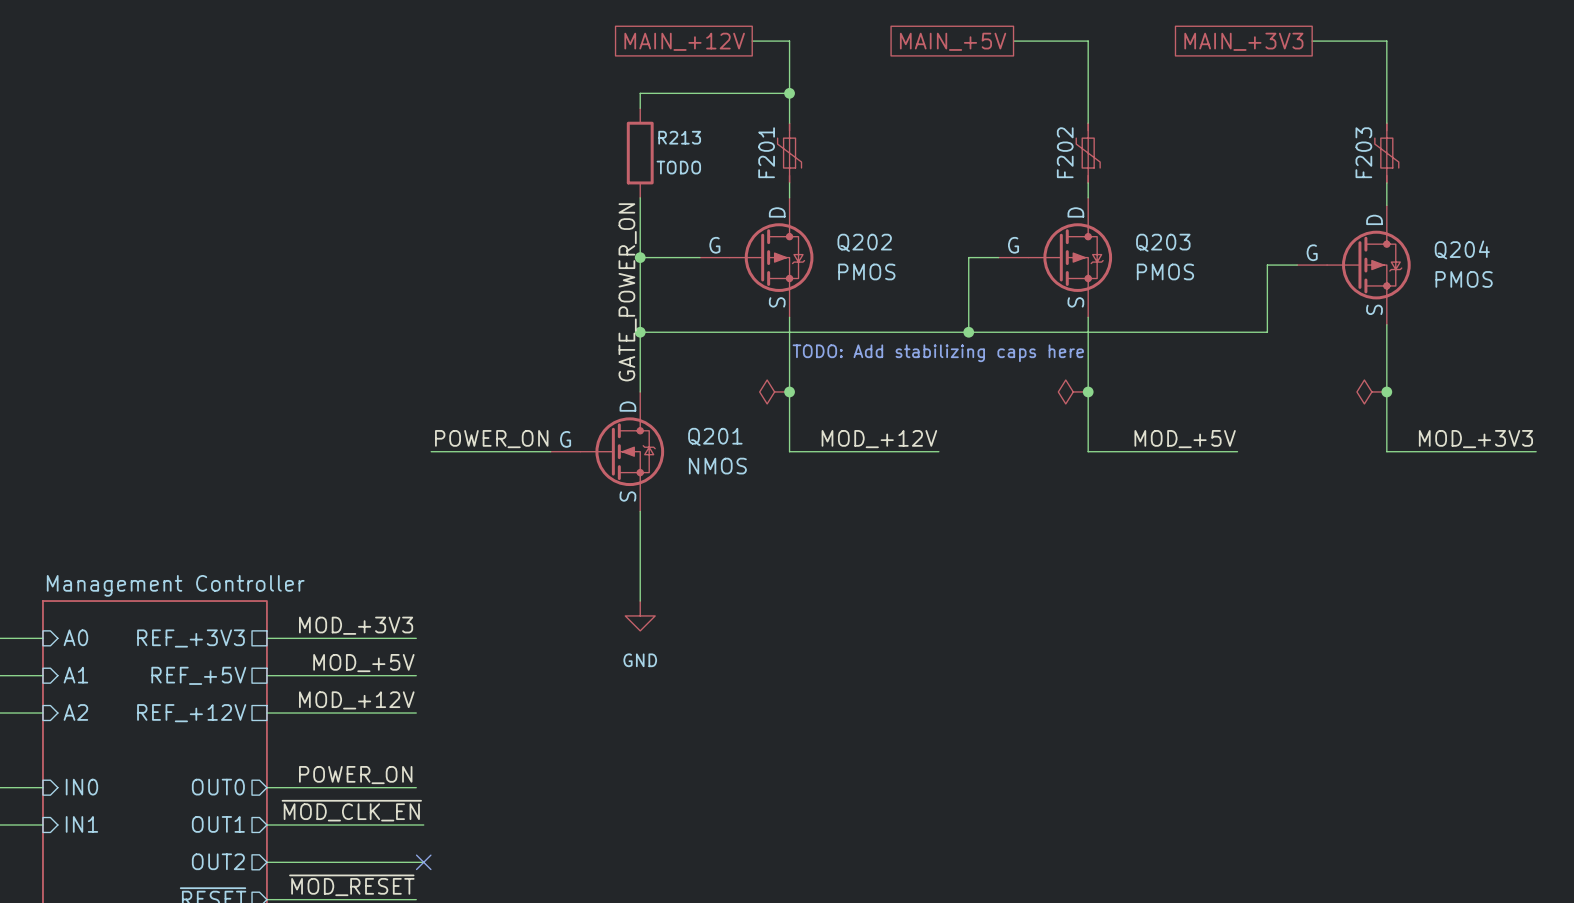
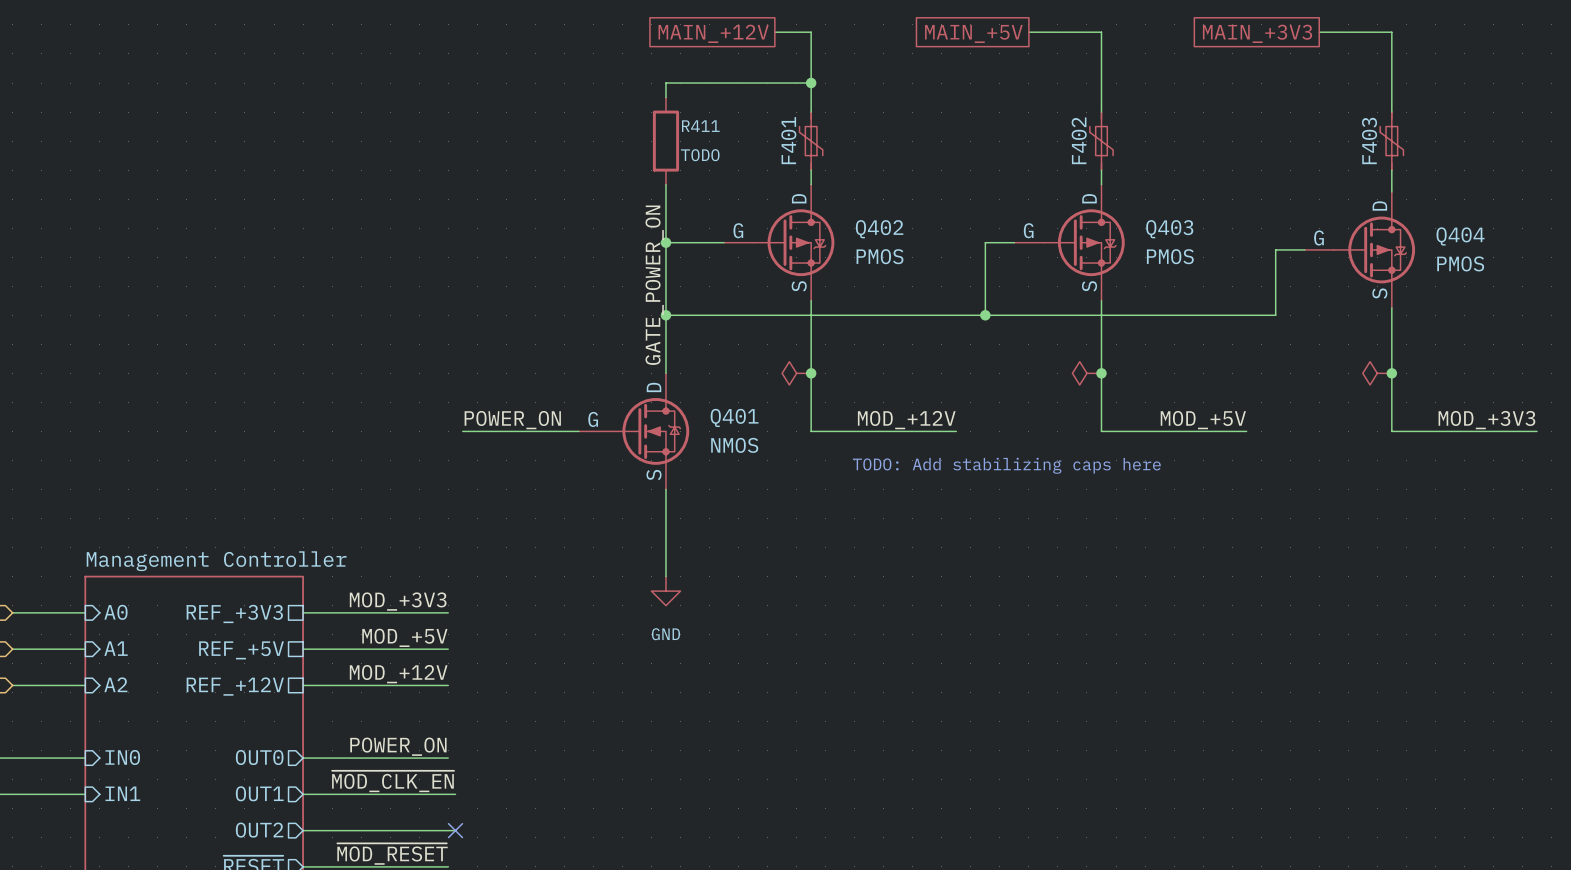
R213 name: R213 (679, 137) -> R411 (700, 126)
F201 name: F201 (766, 152) -> F401 (788, 140)
F202 name: F202 (1065, 152) -> F402 (1079, 140)
F203 name: F203 (1363, 152) -> F403 (1369, 141)
Q202 name: Q202 (864, 242) -> Q402 (879, 229)
Q203 name: Q203 (1163, 242) -> Q403 (1169, 229)
Q204 name: Q204 (1462, 249) -> Q404 (1460, 236)
text position: TODO: Add stabilizing caps here (938, 353) -> TODO: Add stabilizing caps here (1006, 465)
Q201 name: Q201 (715, 436) -> Q401 (734, 417)

